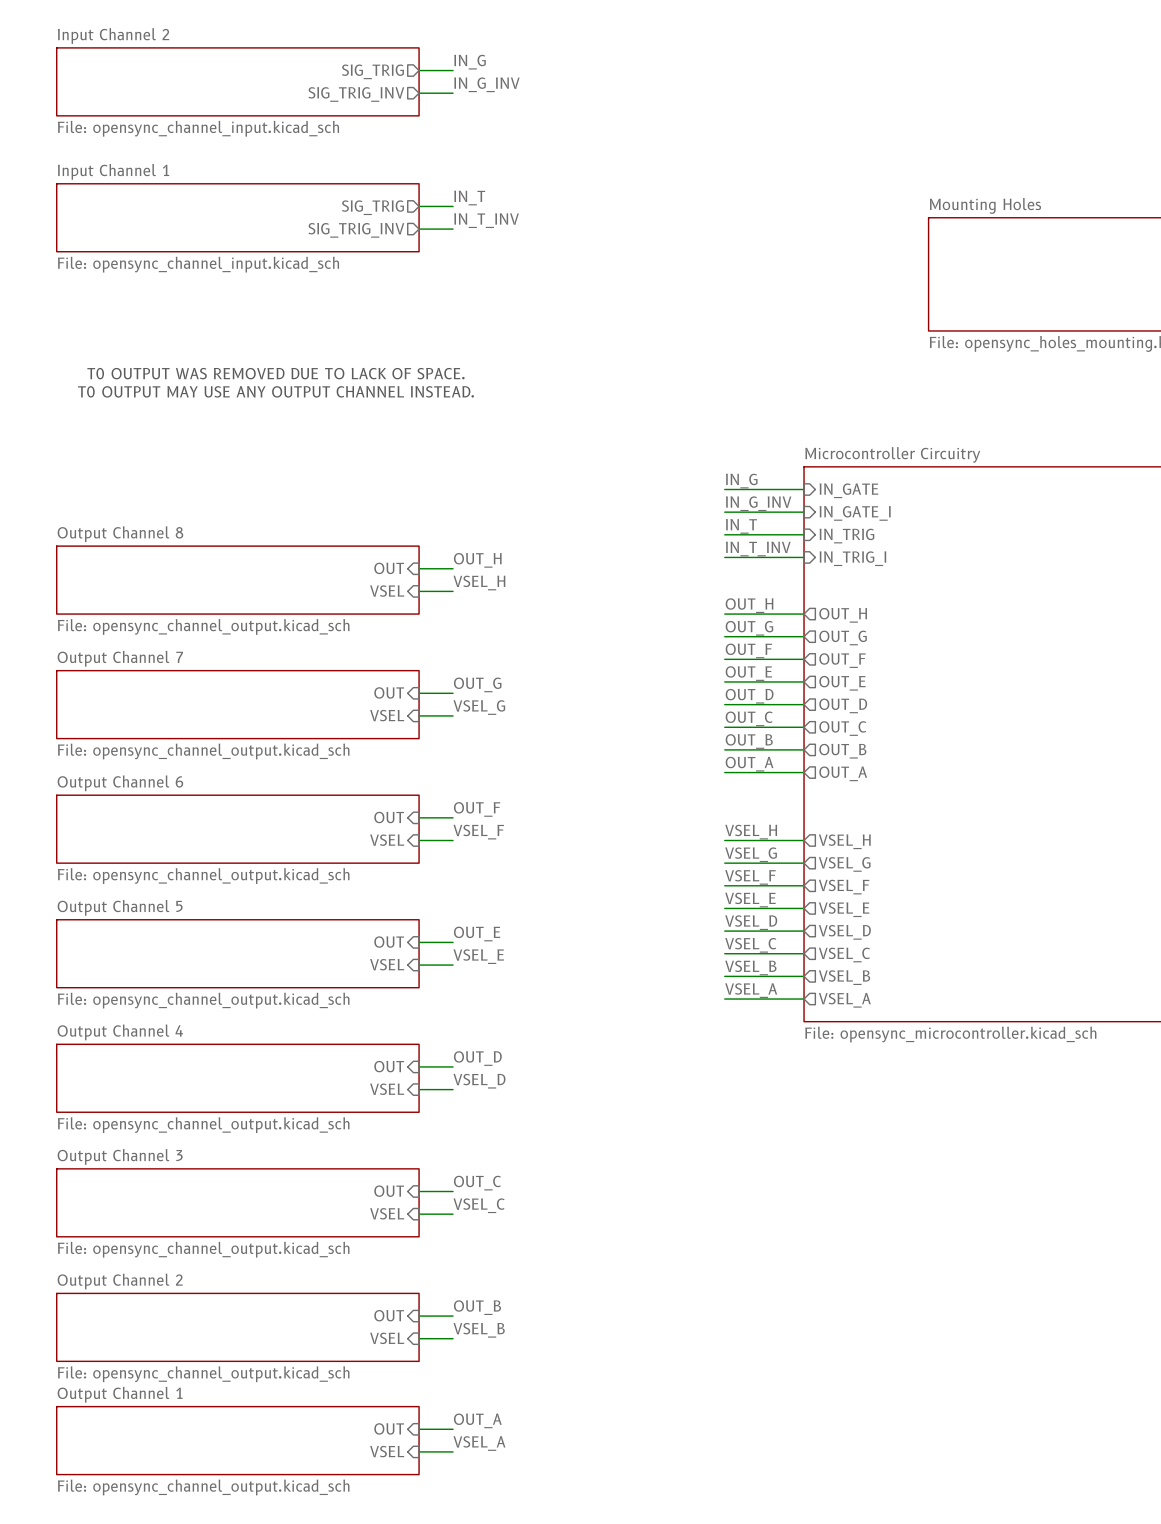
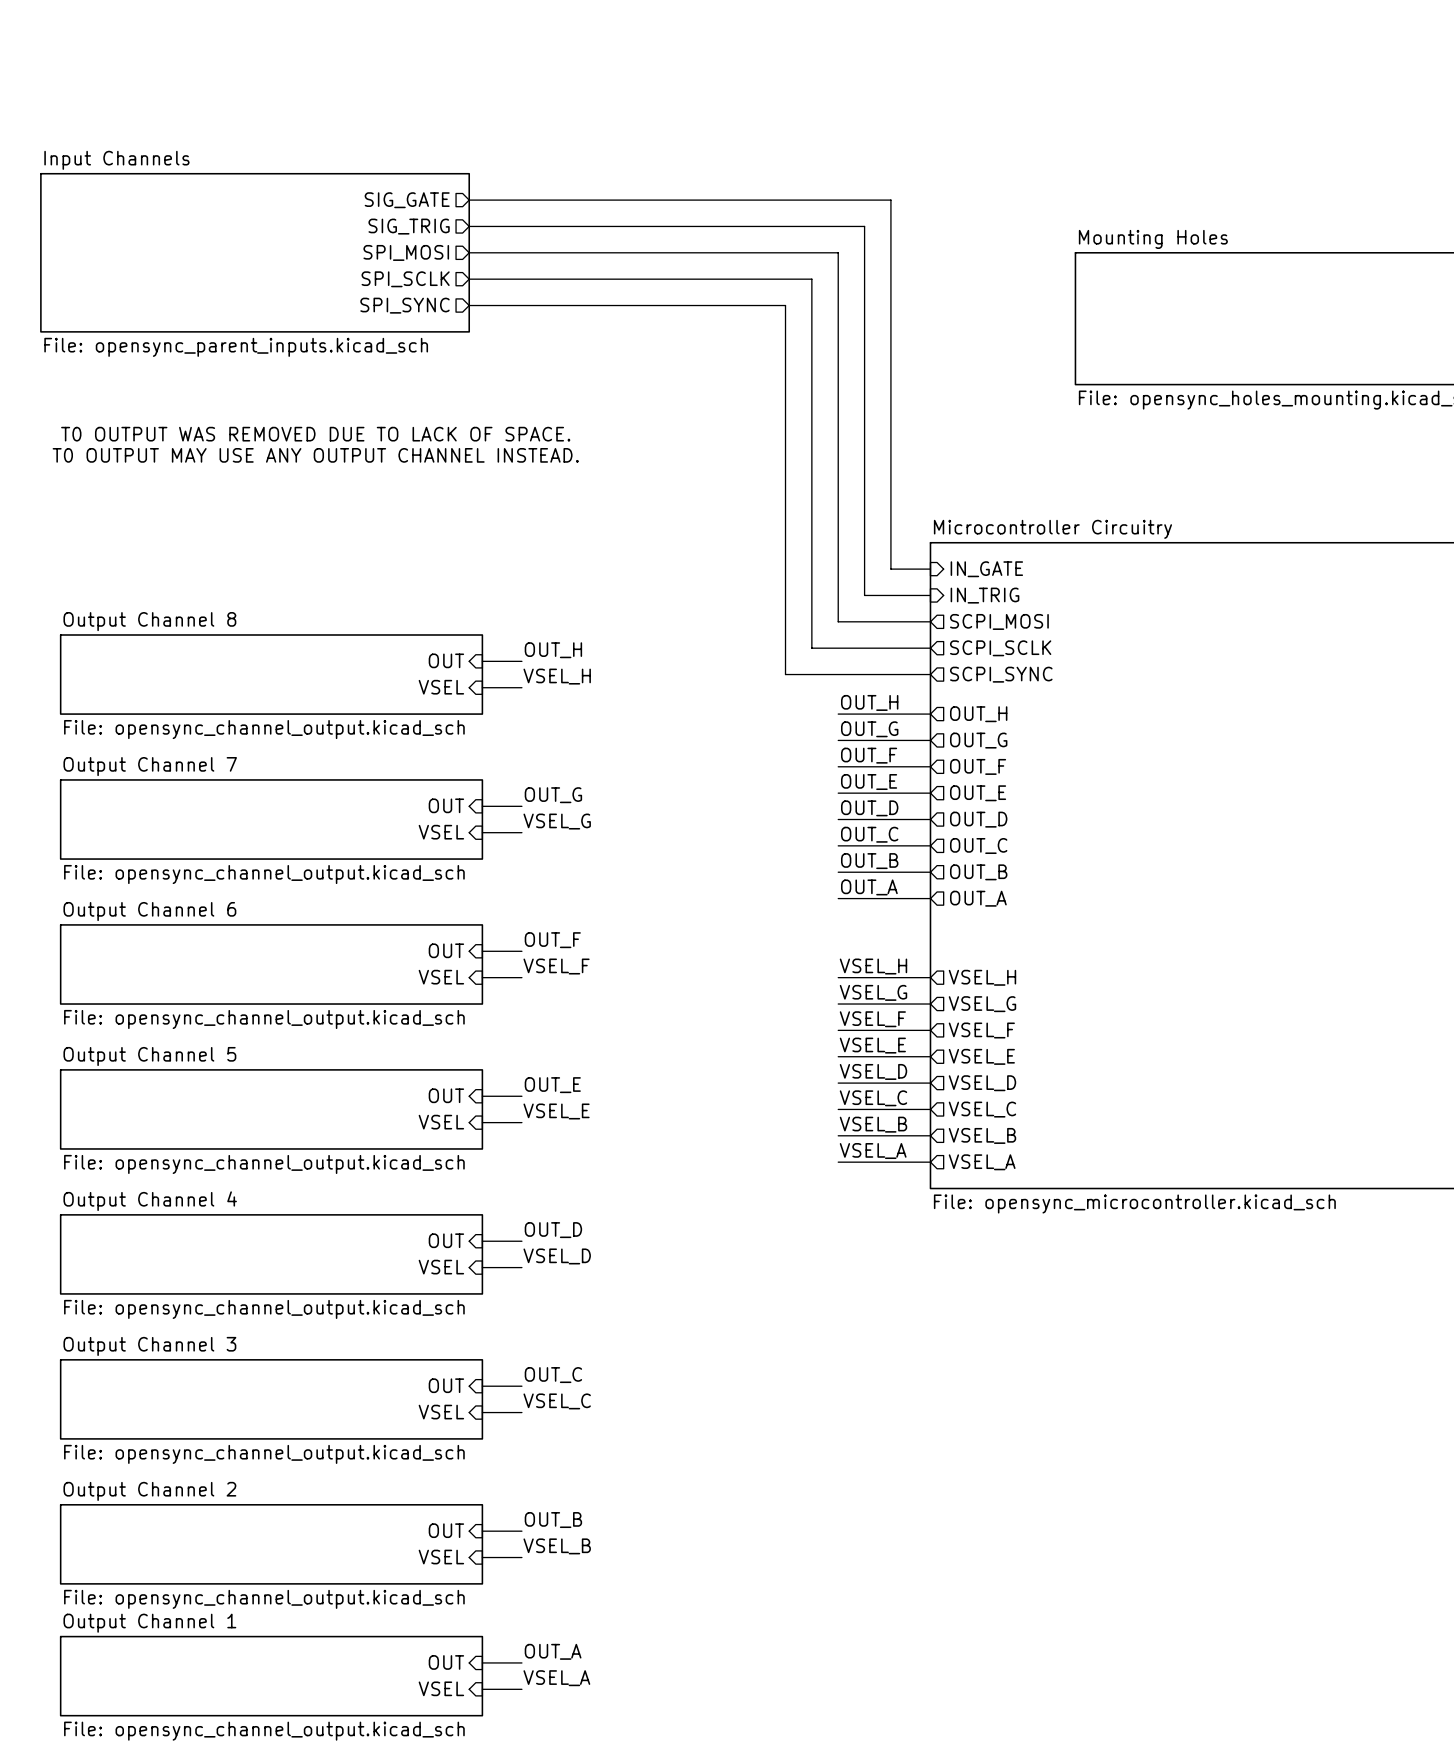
label: IN_G (470, 62) -> none
wire: (419, 70) (453, 70) -> none
sheet pin: SIG_TRIG (372, 71) -> none
sheet Input Channel 2: File: opensync_channel_input.kicad_sch (237, 81) -> none
label: IN_G_INV (486, 84) -> none
wire: (419, 93) (453, 93) -> none
sheet pin: SIG_TRIG_INV (356, 94) -> none
sheet pin: none -> SIG_GATE (407, 200)
label: IN_T (469, 198) -> none
wire: (419, 206) (453, 206) -> none
sheet pin position: SIG_TRIG (372, 207) -> SIG_TRIG (409, 226)
sheet Input Channels: none -> File: opensync_parent_inputs.kicad_sch (255, 252)
sheet Input Channel 1: File: opensync_channel_input.kicad_sch (237, 217) -> none
wire: none -> (469, 252) (838, 252) (838, 621)
sheet pin: none -> SPI_MOSI (406, 252)
label: IN_T_INV (486, 220) -> none
wire: (419, 229) (453, 229) -> none
sheet pin: SIG_TRIG_INV (356, 230) -> none
wire: none -> (469, 279) (811, 279) (811, 648) (838, 648)
sheet pin: none -> SPI_SCLK (405, 279)
wire: none -> (469, 305) (785, 305) (785, 674) (930, 674)
sheet pin: none -> SPI_SYNC (405, 305)
label: IN_G (741, 481) -> none
wire: (724, 489) (770, 489) -> (469, 200) (890, 200) (890, 569)
label: IN_G_INV (758, 503) -> none
wire: (724, 512) (747, 512) -> (469, 226) (864, 226) (864, 595)
sheet pin: IN_GATE_I (855, 513) -> IN_TRIG (984, 595)
label: IN_T (741, 526) -> none
sheet pin shape: input (846, 536) -> output (999, 621)
sheet pin: IN_TRIG (846, 536) -> SCPI_MOSI (999, 621)
label: IN_T_INV (758, 549) -> none
sheet pin shape: input (852, 558) -> output (1000, 648)
sheet pin: IN_TRIG_I (852, 558) -> SCPI_SCLK (1000, 648)
sheet pin: none -> SCPI_SYNC (1001, 674)

